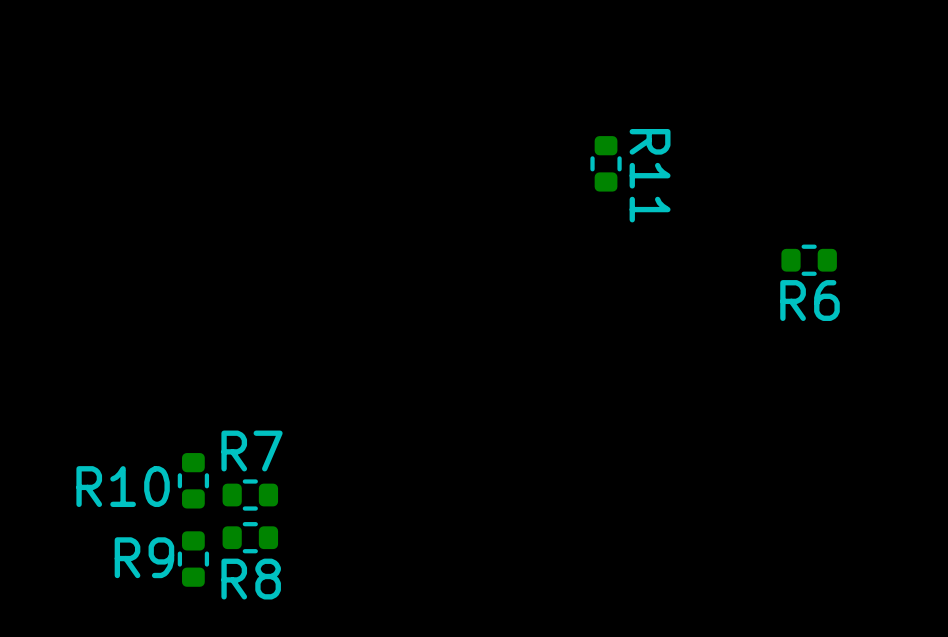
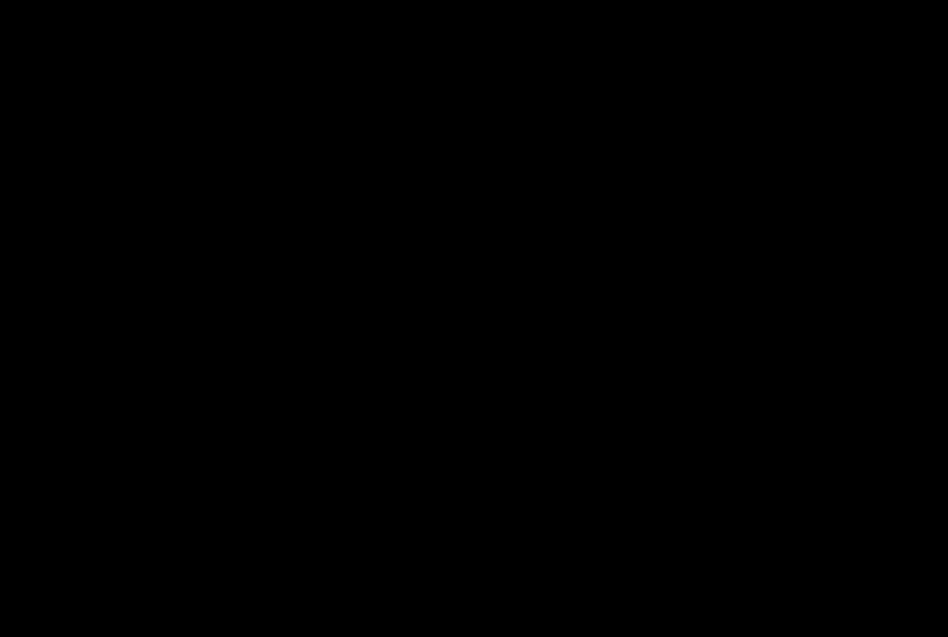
R11: (606, 163) -> none
R6: (809, 260) -> none
R10: (193, 480) -> none
R7: (250, 495) -> none
R8: (250, 537) -> none
R9: (193, 559) -> none

